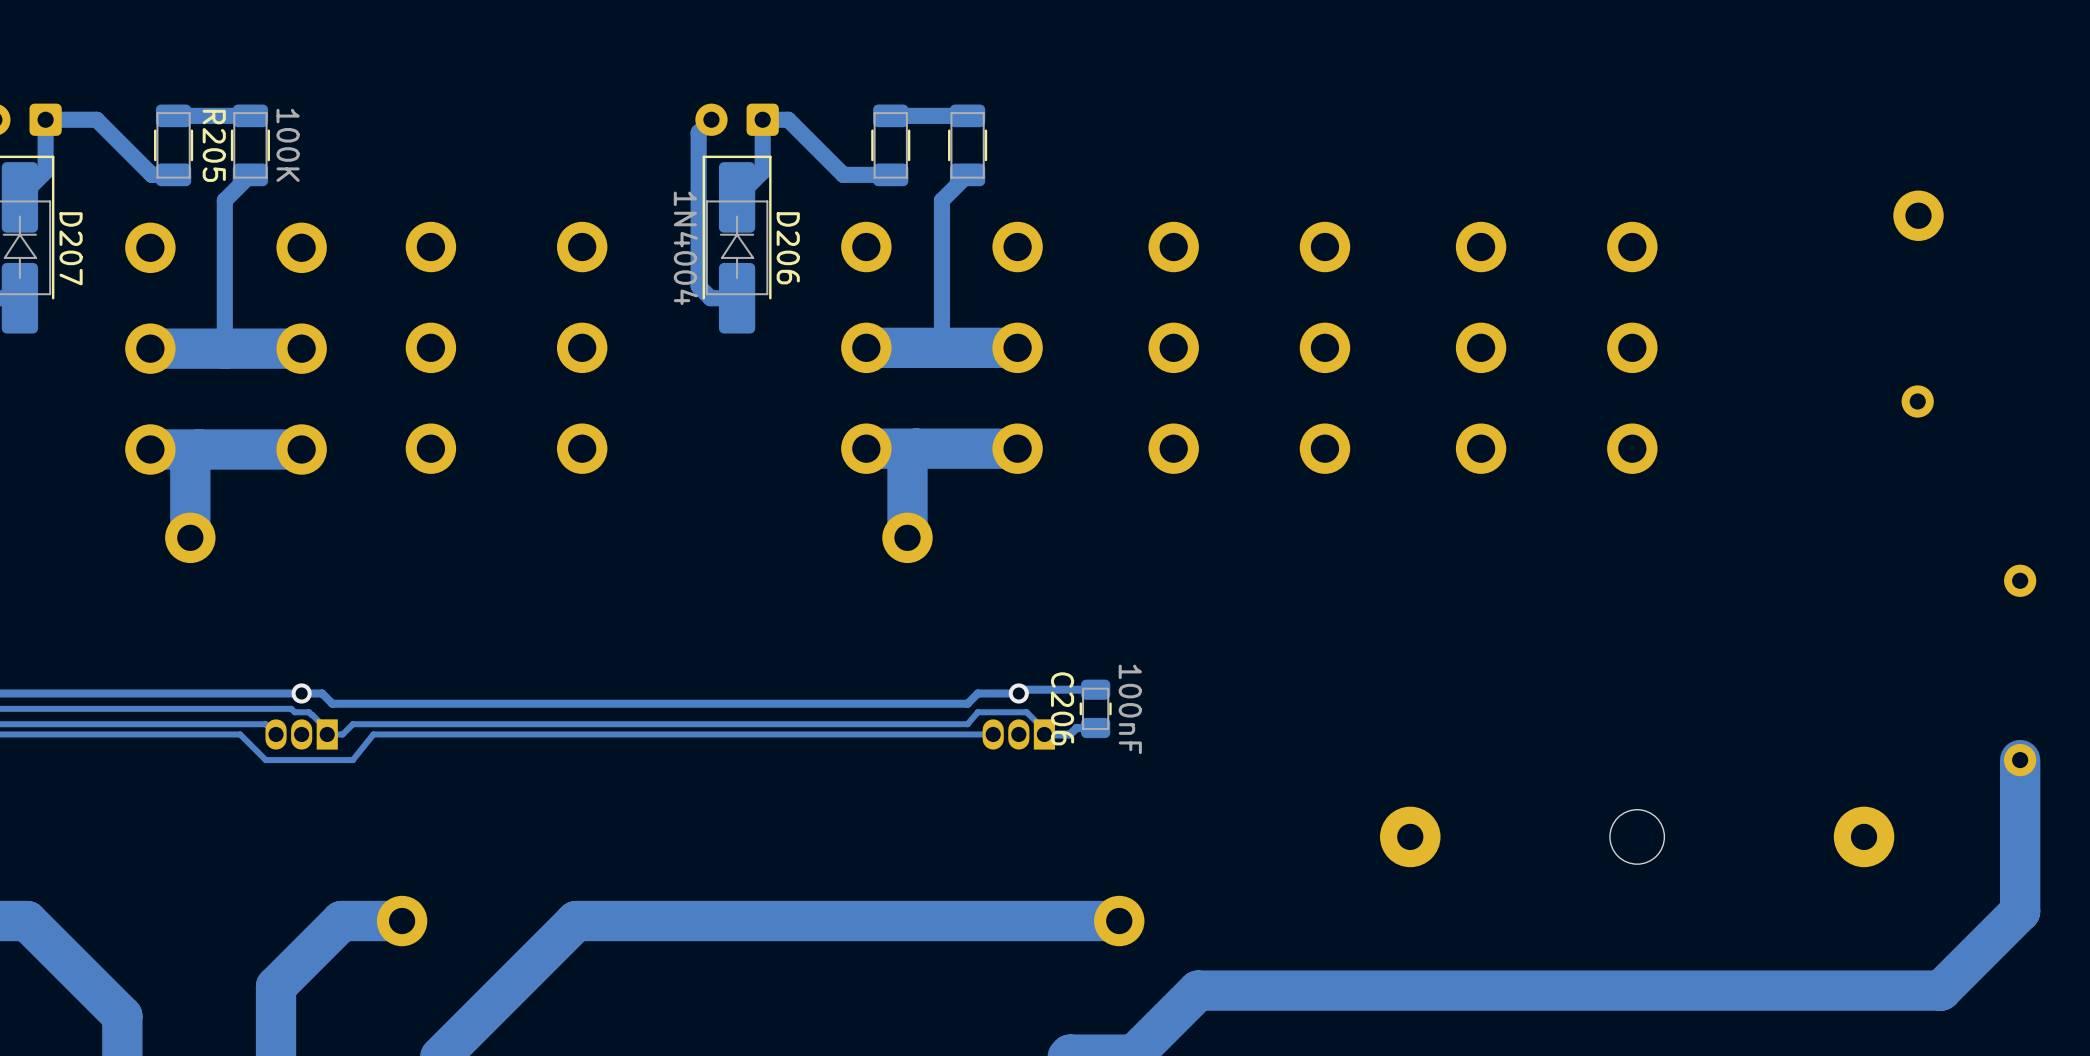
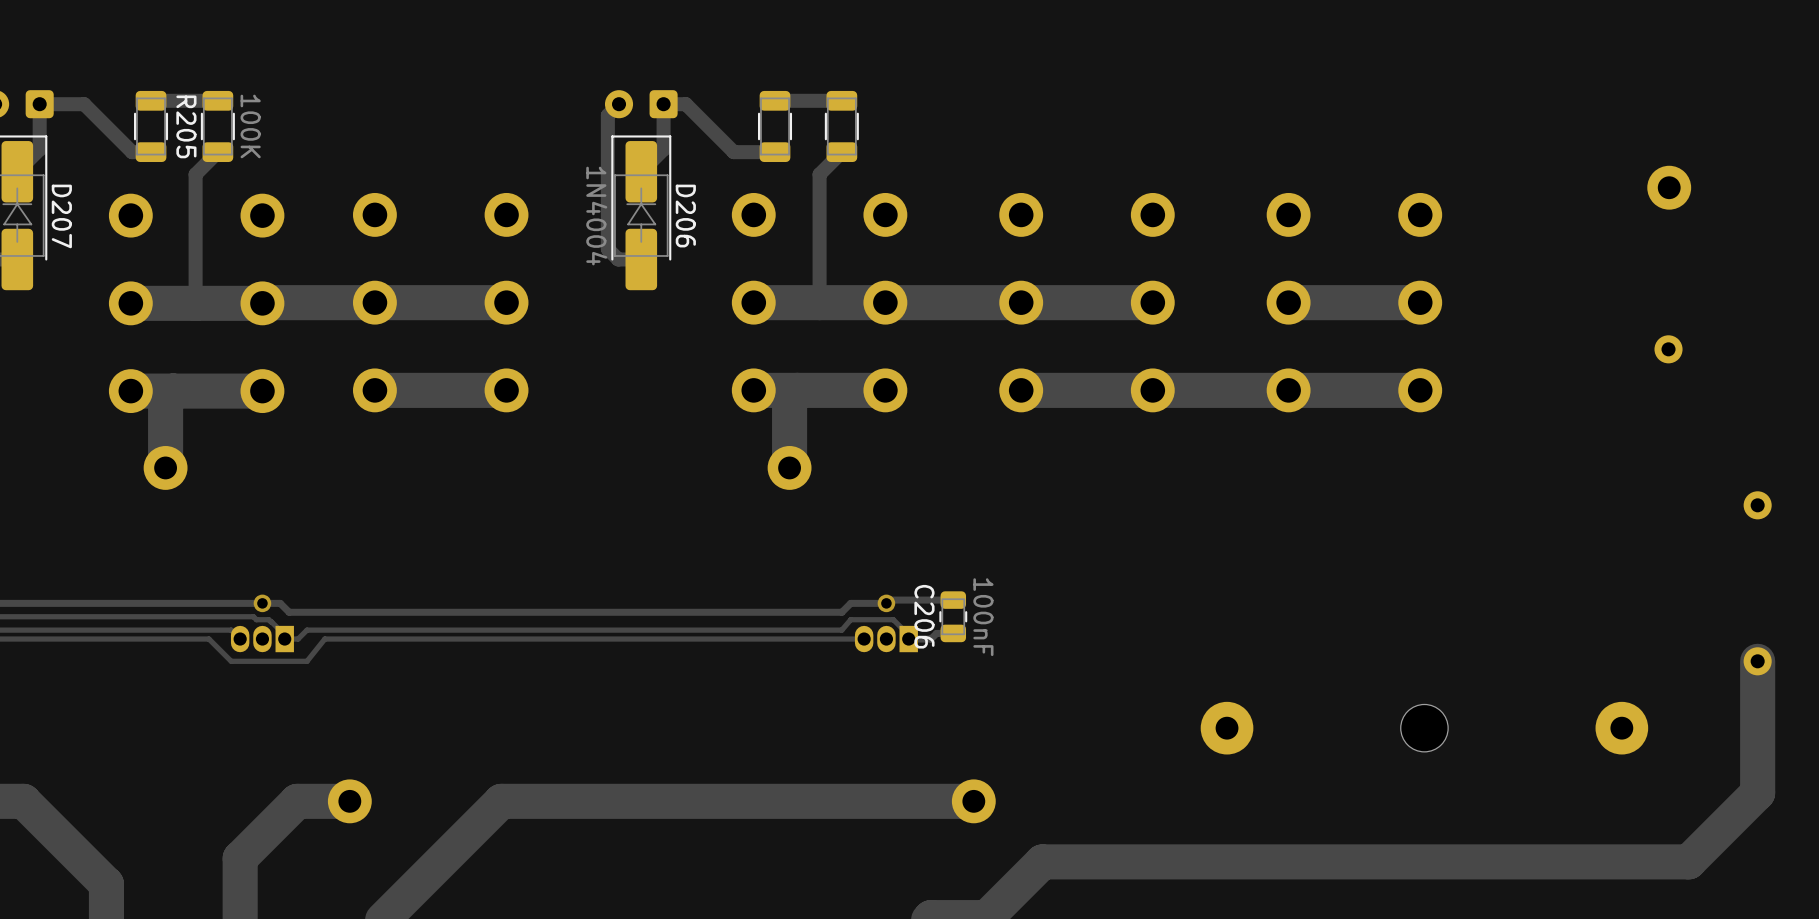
track: none -> (506, 302) (262, 303)
track: none -> (1152, 302) (885, 302)
track: none -> (1420, 302) (1288, 302)
track: none -> (506, 390) (374, 390)
track: none -> (1420, 390) (1021, 390)

